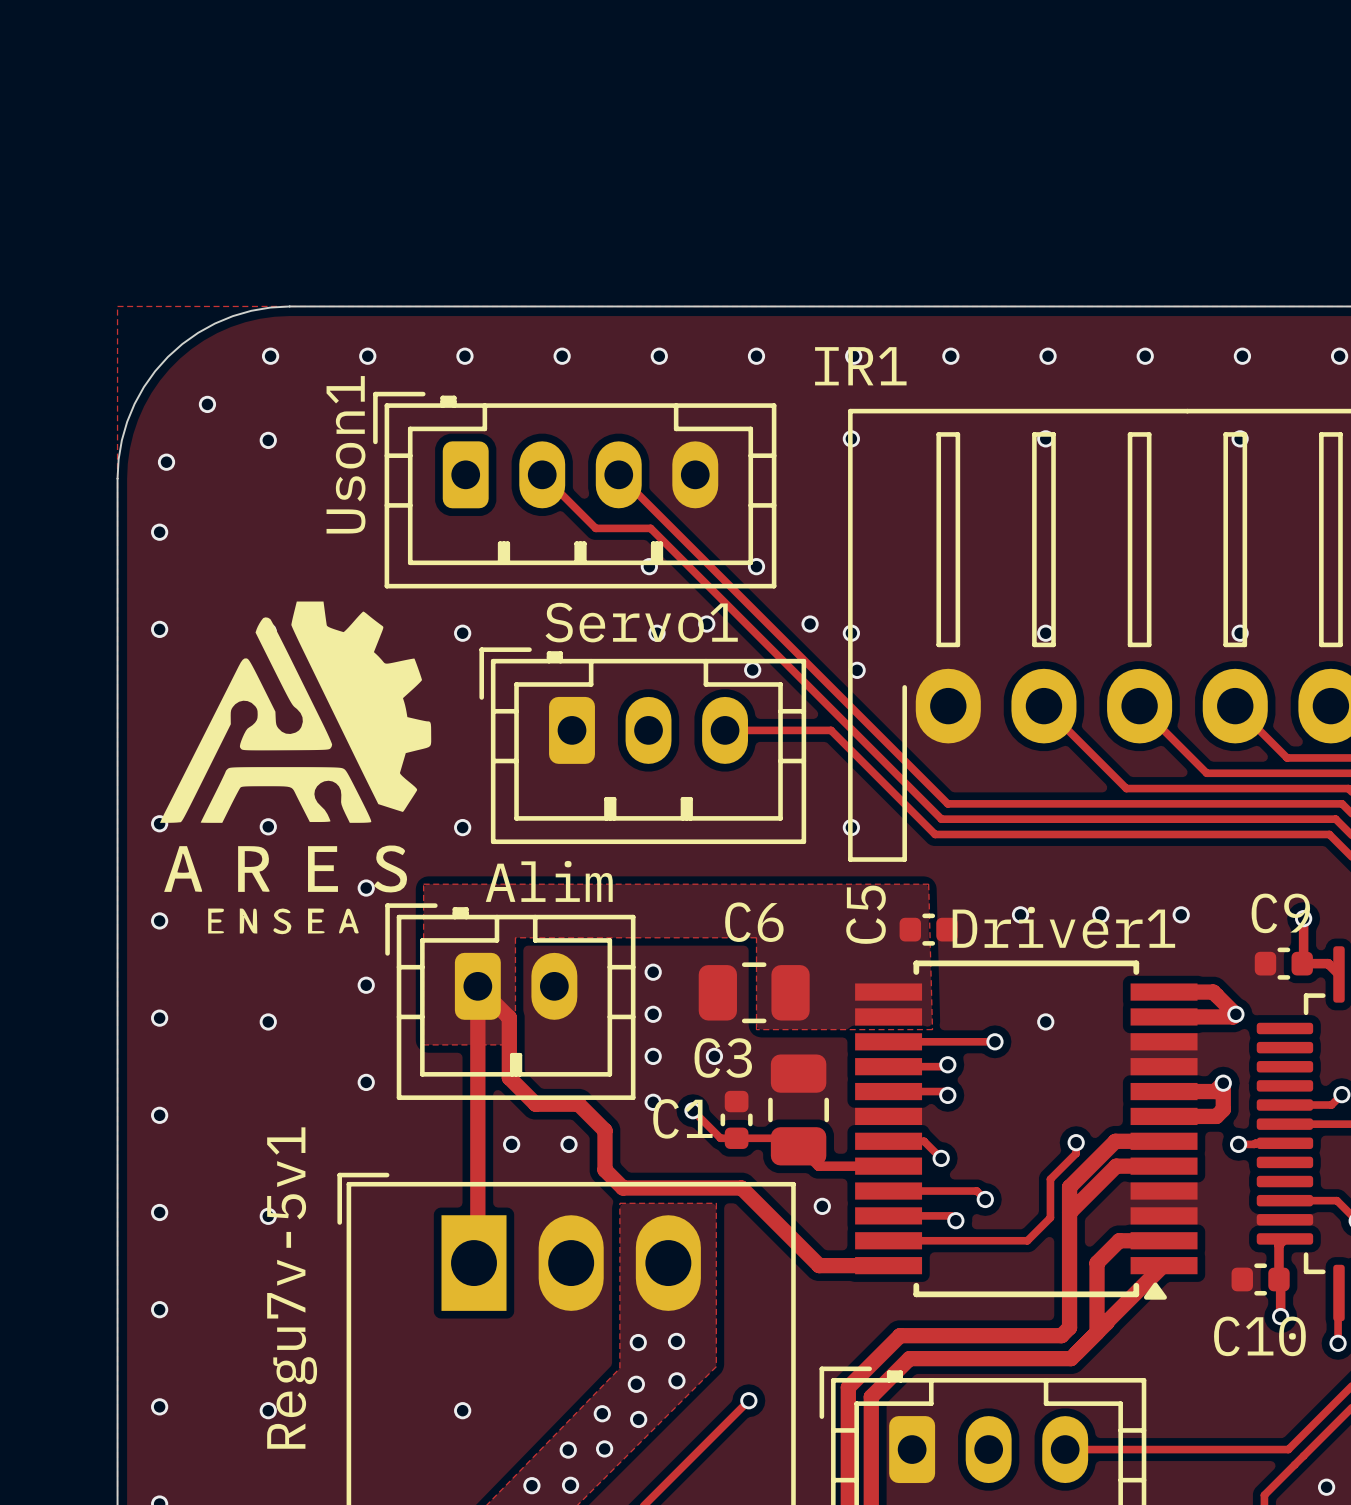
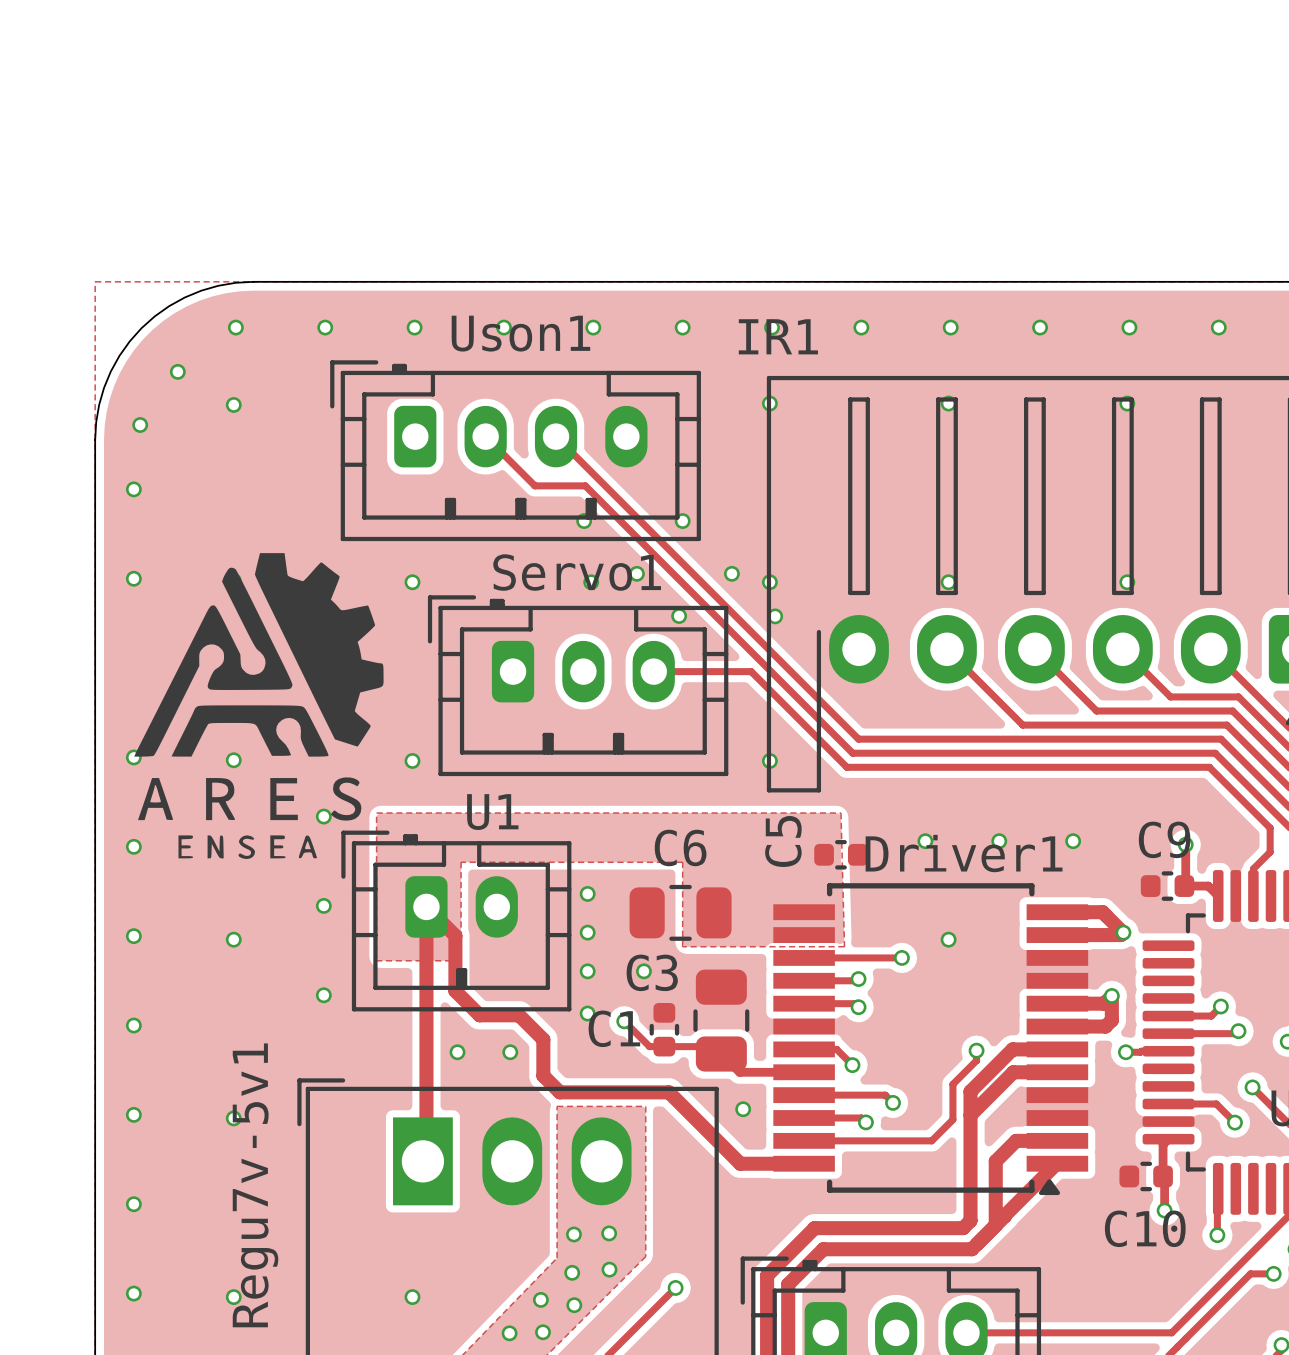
Uson1 name rotation: 0° (346, 454) -> 90° clockwise (520, 333)
Uson1 name position: Uson1 (346, 454) -> Uson1 (520, 333)
Alim name: Alim (549, 881) -> U1 (492, 812)

